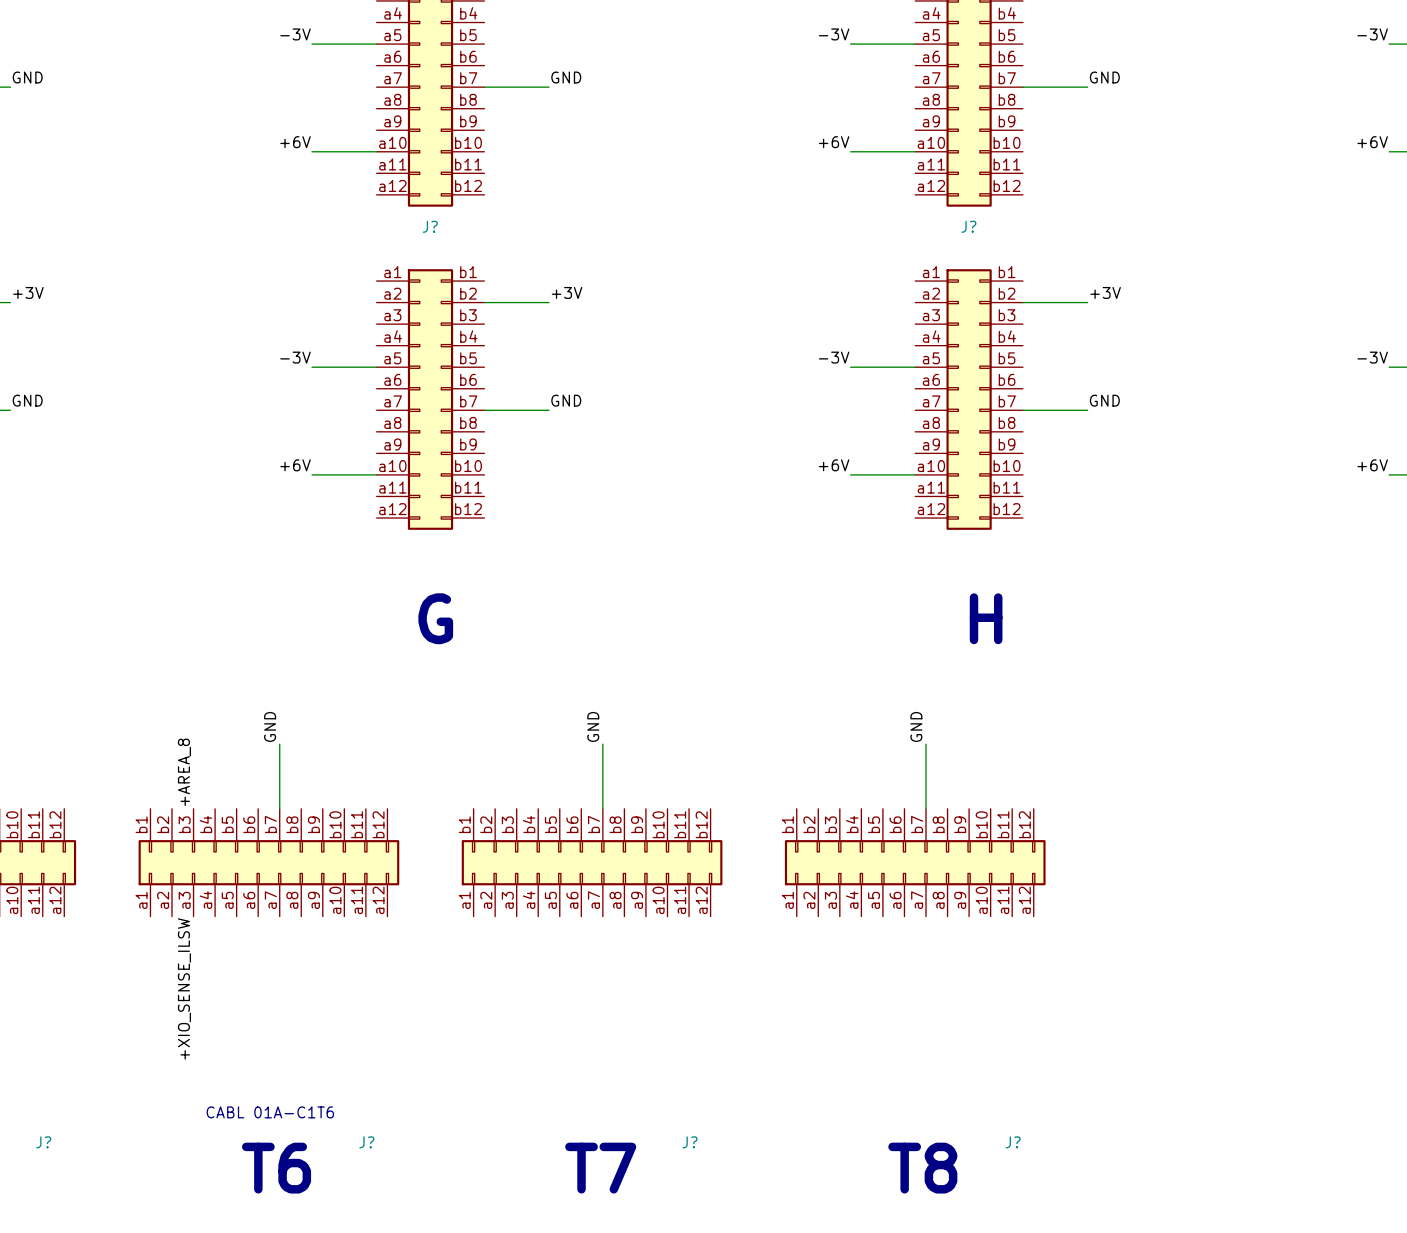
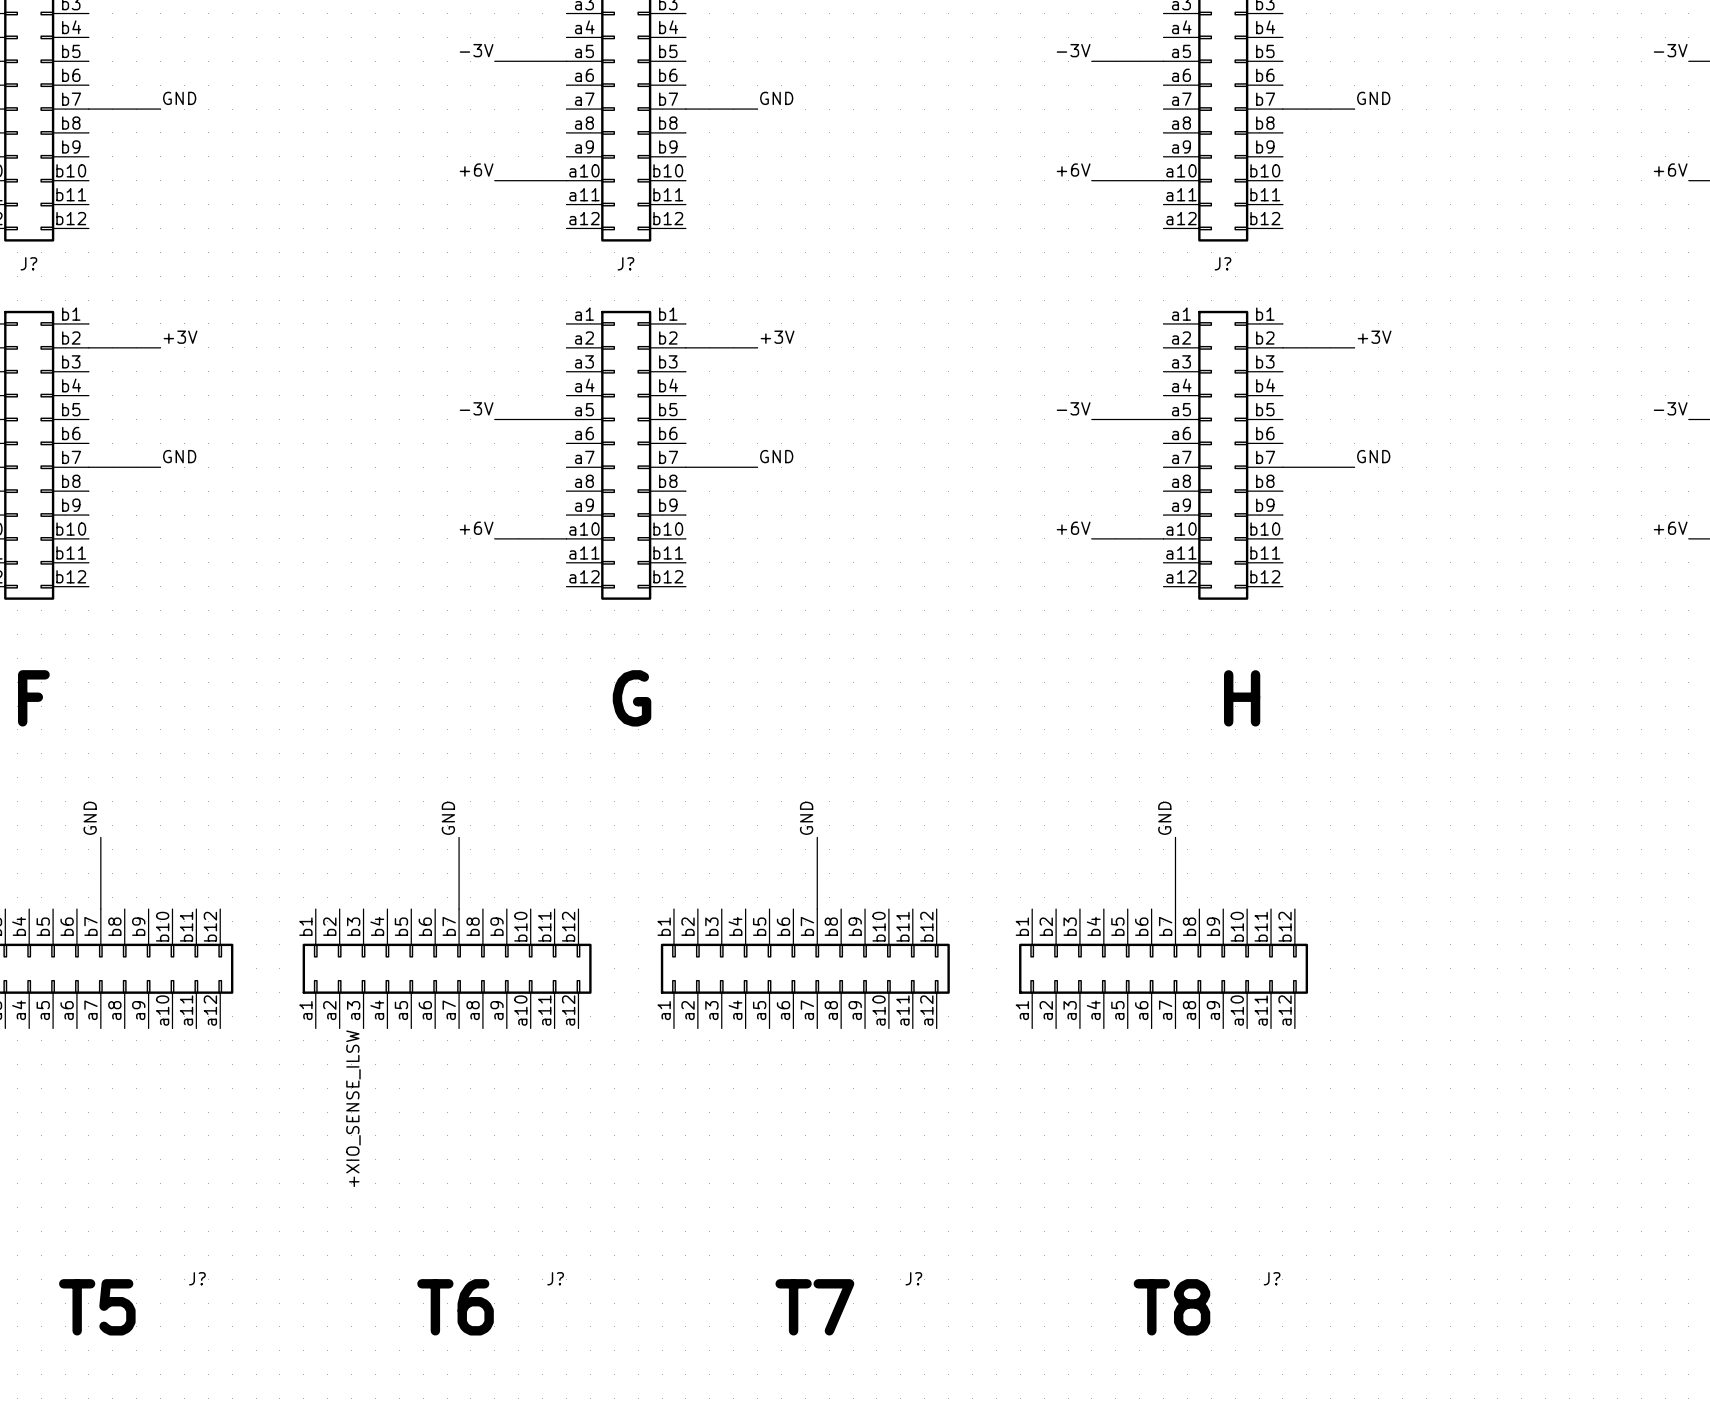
label: +AREA_8 (184, 772) -> none
text: CABL 01A-C1T6 (270, 1112) -> none

